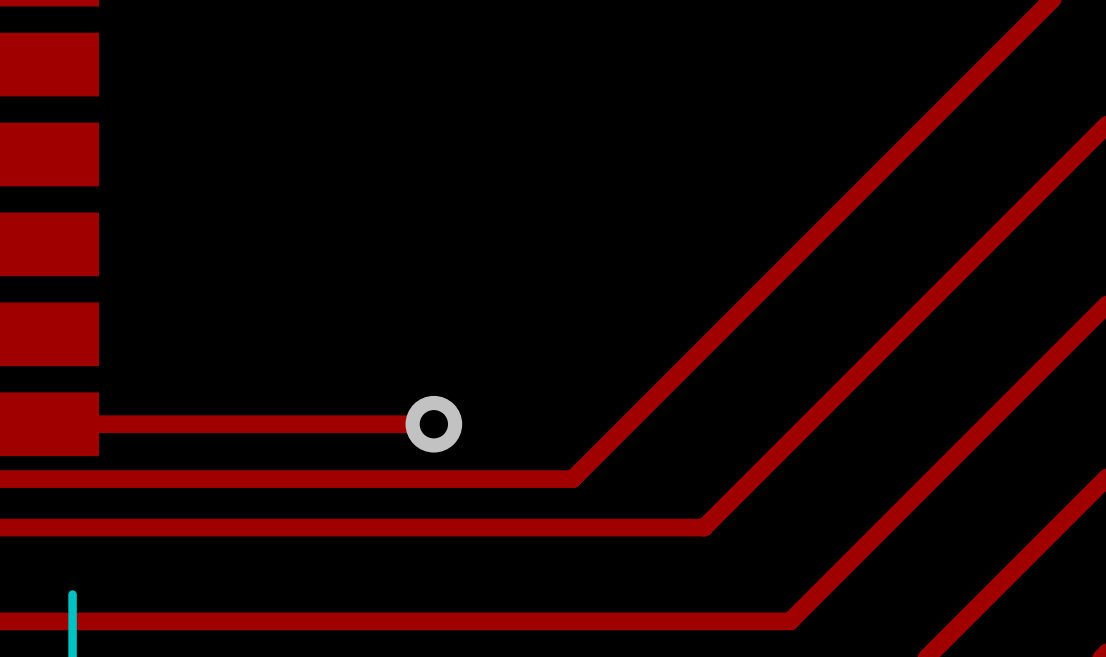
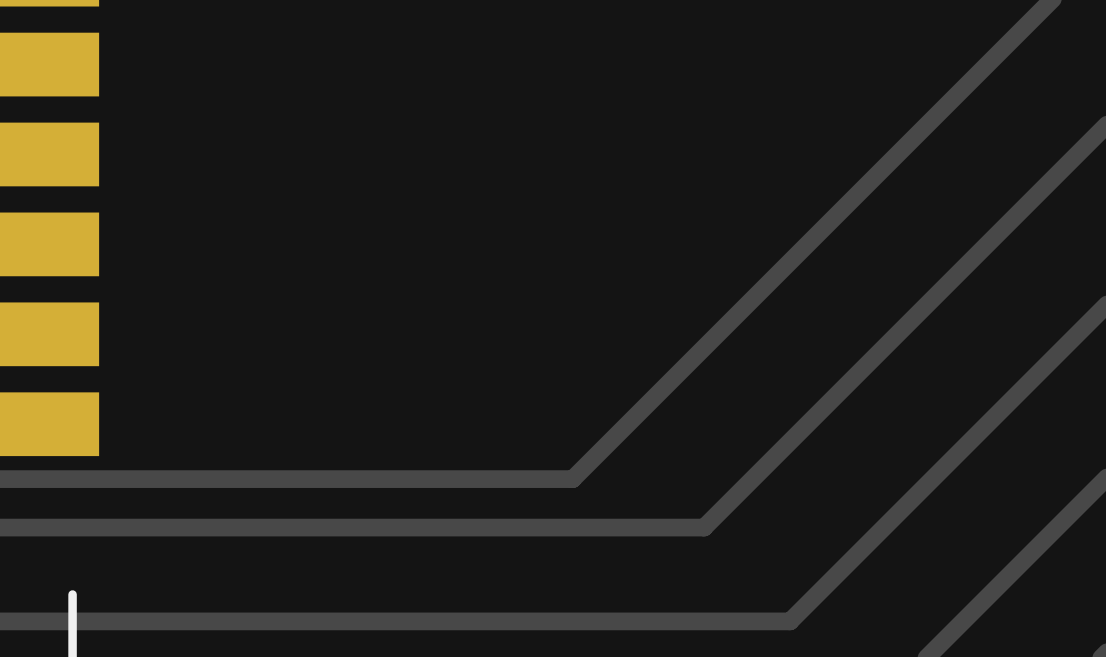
track: (28, 424) (433, 424) -> none
via: (433, 424) -> none

